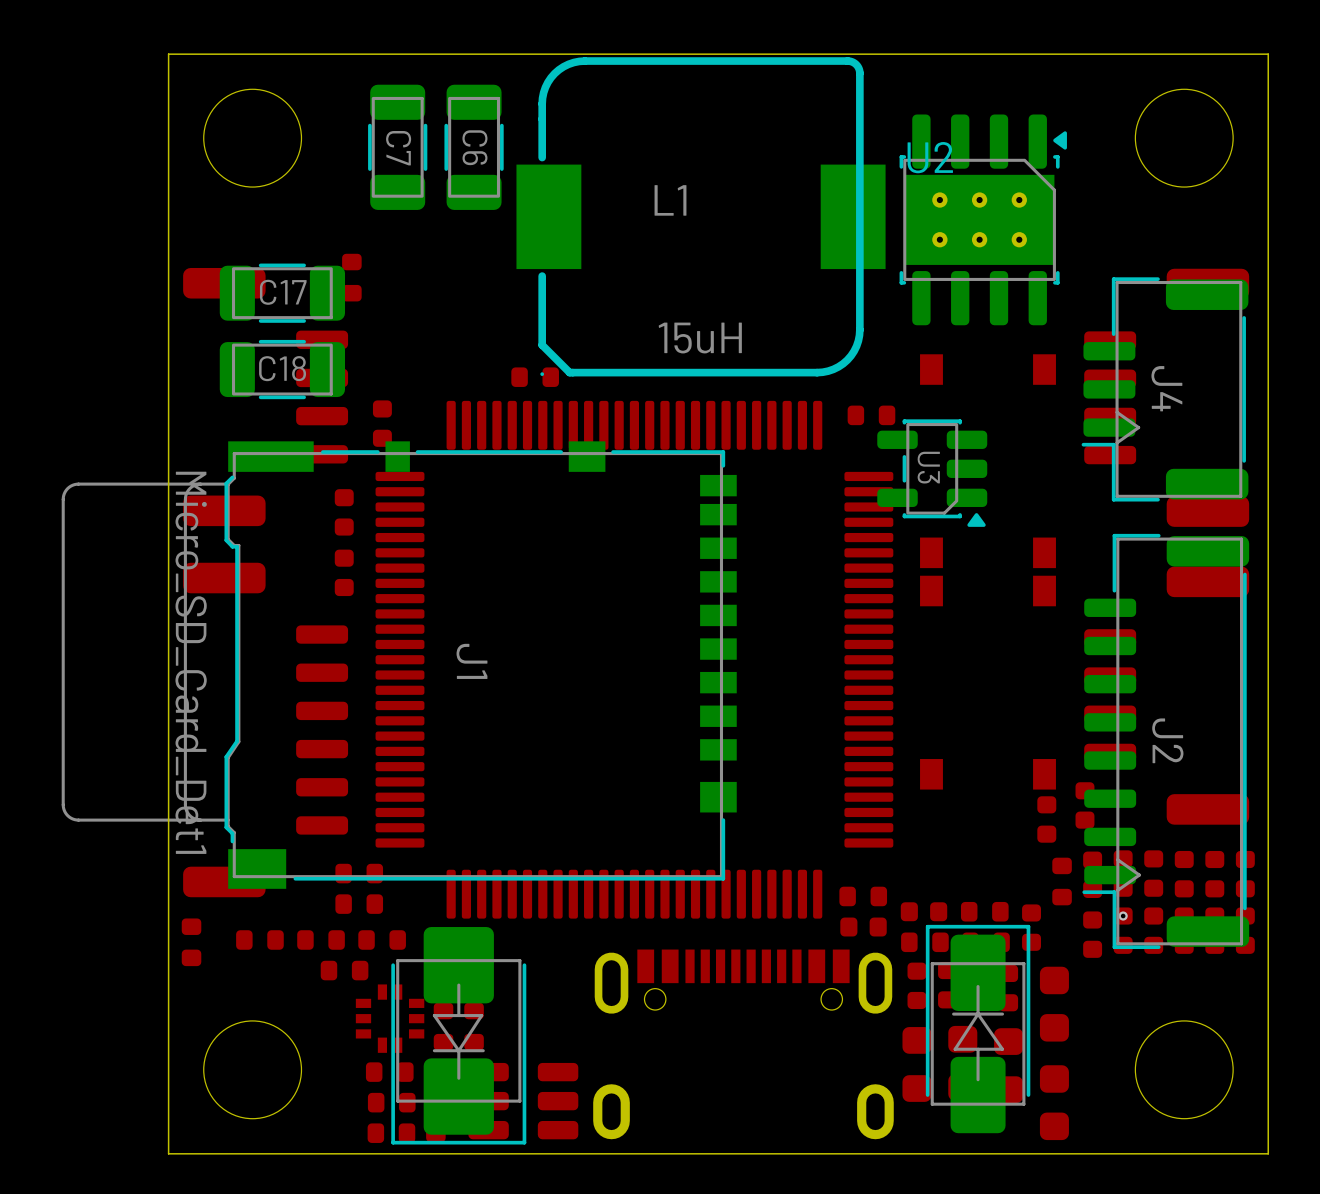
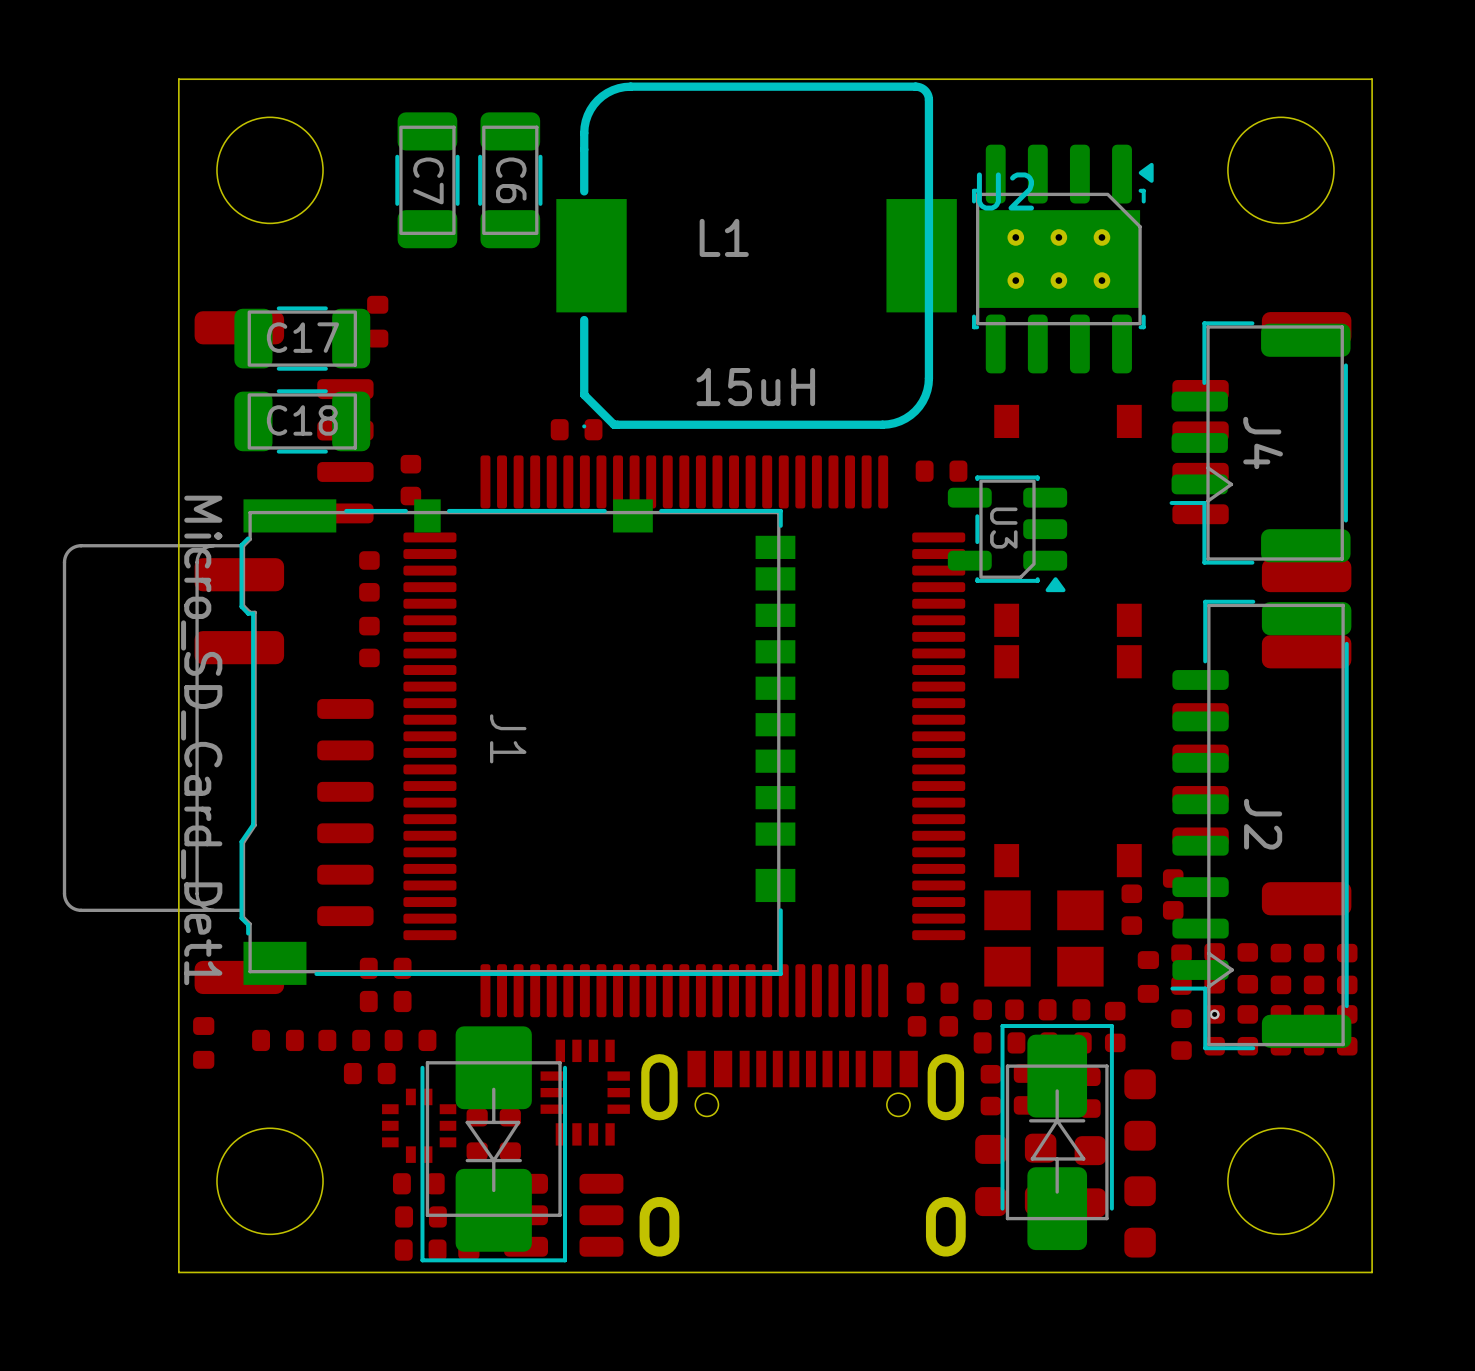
part: none -> (1043, 938)
part: none -> (585, 1092)

